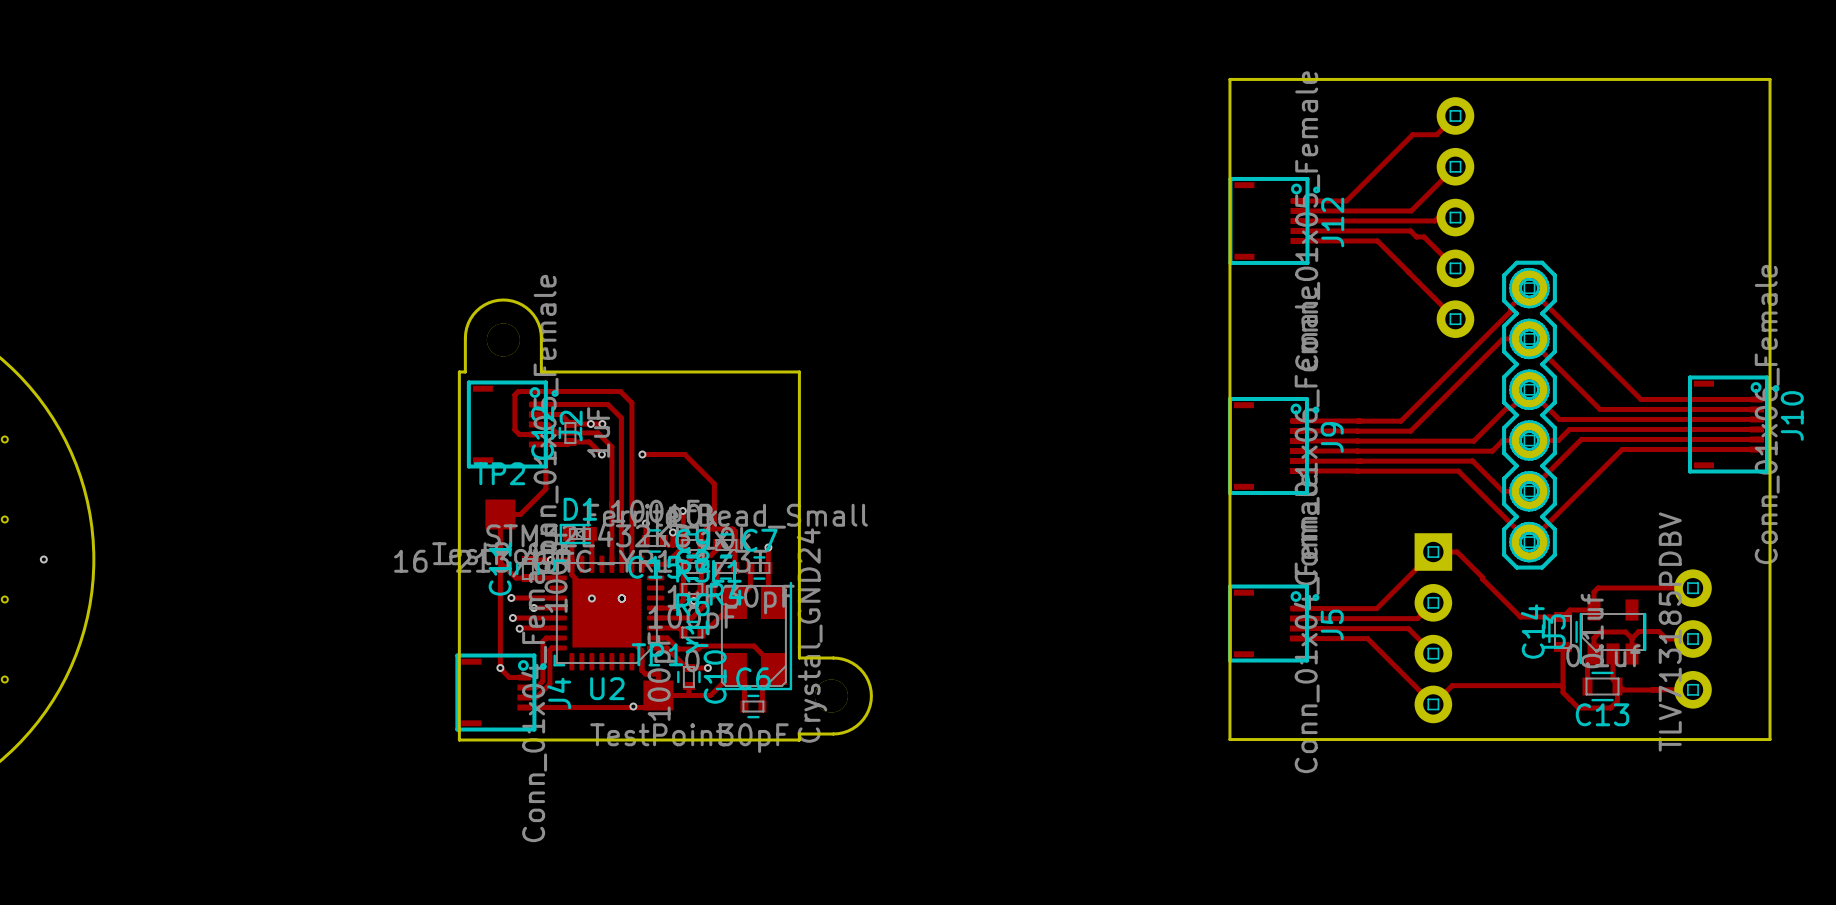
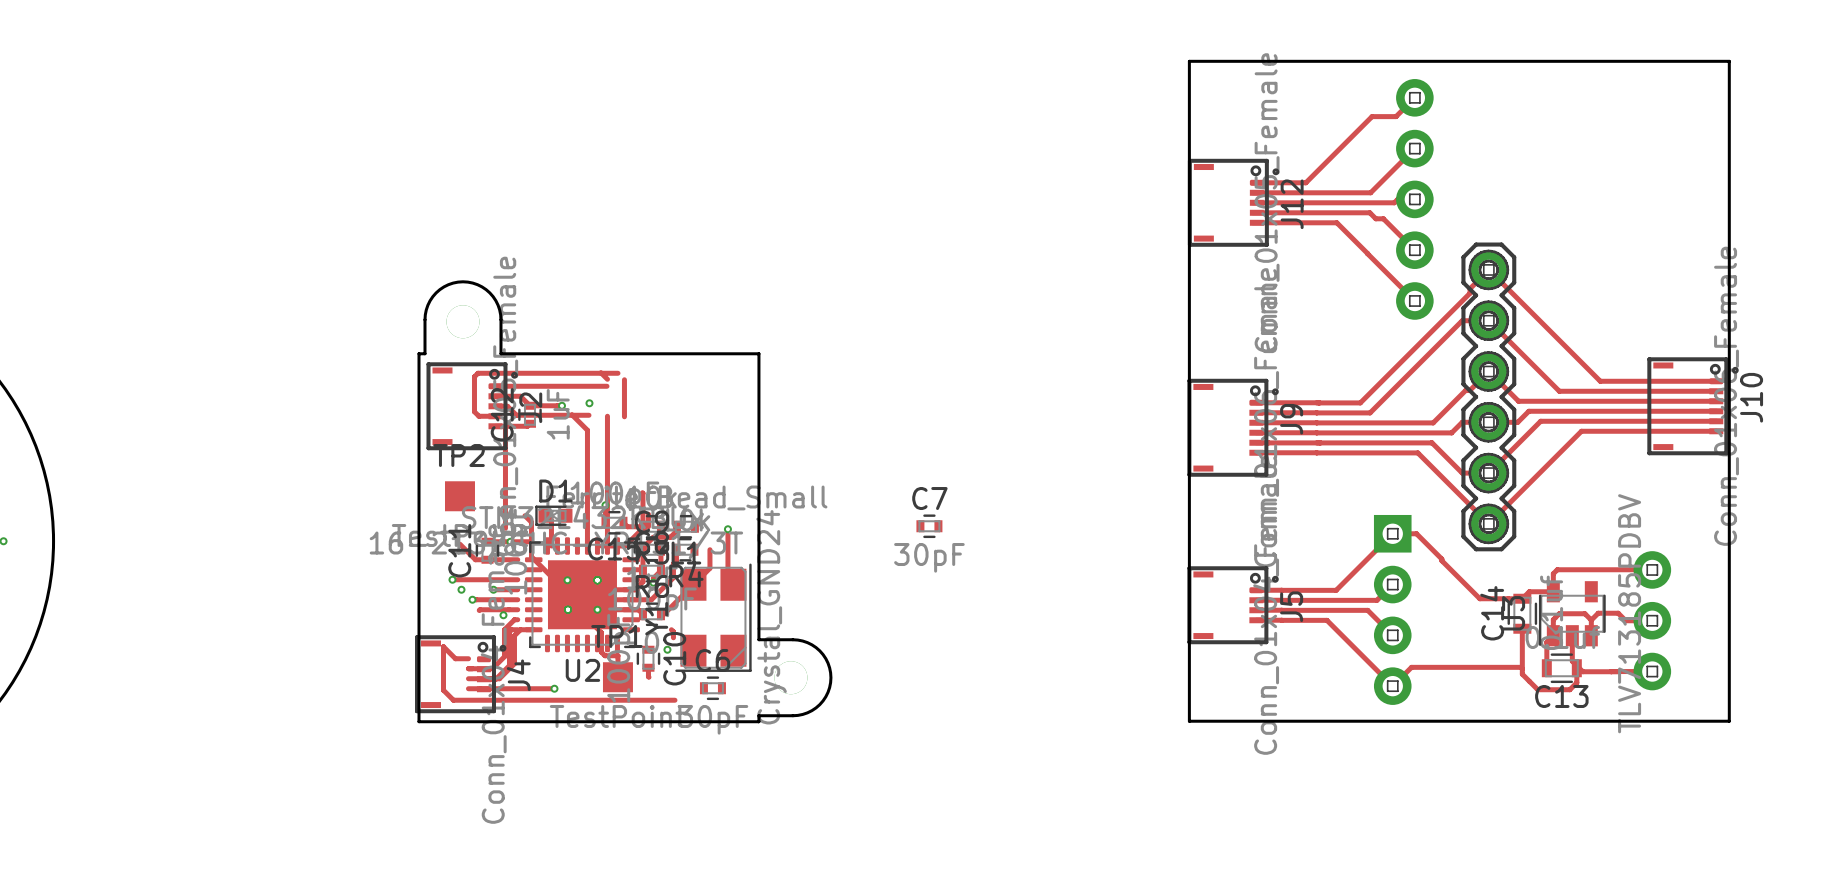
track: none -> (600, 372) (607, 379)
track: (620, 391) (631, 402) (631, 564) -> (579, 373) (617, 373)
track: none -> (624, 379) (624, 416)
track: (607, 404) (621, 417) (621, 564) -> (567, 386) (606, 386)
via: none -> (589, 403)
via: (590, 423) -> none
track: (556, 432) (597, 432) (611, 447) (611, 564) -> (515, 414) (588, 415)
track: none -> (571, 414) (587, 430) (587, 546)
track: none -> (607, 416) (607, 546)
track: (570, 441) (589, 441) (601, 454) -> none
via: (601, 454) -> none
track: (642, 454) (684, 454) (714, 483) (714, 529) -> none
via: (642, 454) -> none
track: (545, 488) (520, 514) (500, 514) (500, 668) (509, 677) (524, 677) -> (505, 470) (505, 528)
via: (682, 510) -> none
track: (672, 532) (672, 545) -> (648, 514) (648, 526)
via: (672, 532) -> none
D1 position: (578, 534) -> (553, 515)
track: (701, 545) (701, 534) (706, 529) (732, 529) (735, 531) (734, 568) -> none
C7 position: (759, 568) -> (929, 526)
track: none -> (452, 579) (470, 579)
via: none -> (452, 579)
via: (511, 598) -> none
via: (591, 598) -> none
via: none -> (567, 580)
via: (621, 598) -> none
via: none -> (597, 580)
via: none -> (461, 589)
U2 position: (606, 613) -> (582, 594)
via: (519, 628) -> none
via: none -> (567, 609)
via: none -> (597, 609)
via: none -> (503, 615)
track: (554, 638) (546, 638) (542, 641) (542, 681) (536, 687) (524, 687) -> (514, 619) (504, 629) (504, 656) (492, 668) (468, 668)
track: (655, 638) (667, 638) (678, 649) (698, 649) (701, 646) (753, 646) (773, 666) (773, 669) (762, 680) (762, 706) -> none
track: none -> (533, 629) (520, 629) (514, 635) (514, 663) (499, 678) (468, 678)
track: (655, 648) (666, 648) (686, 668) (707, 668) -> none
track: none -> (671, 629) (673, 637)
via: (500, 668) -> none
track: none -> (468, 658) (455, 658) (443, 646) (443, 690) (453, 700) (674, 700)
via position: (633, 706) -> (554, 688)
track: (744, 706) (744, 679) (733, 669) (733, 672) (710, 695) (658, 695) (646, 707) (524, 707) -> none
track: none -> (468, 688) (554, 688)

